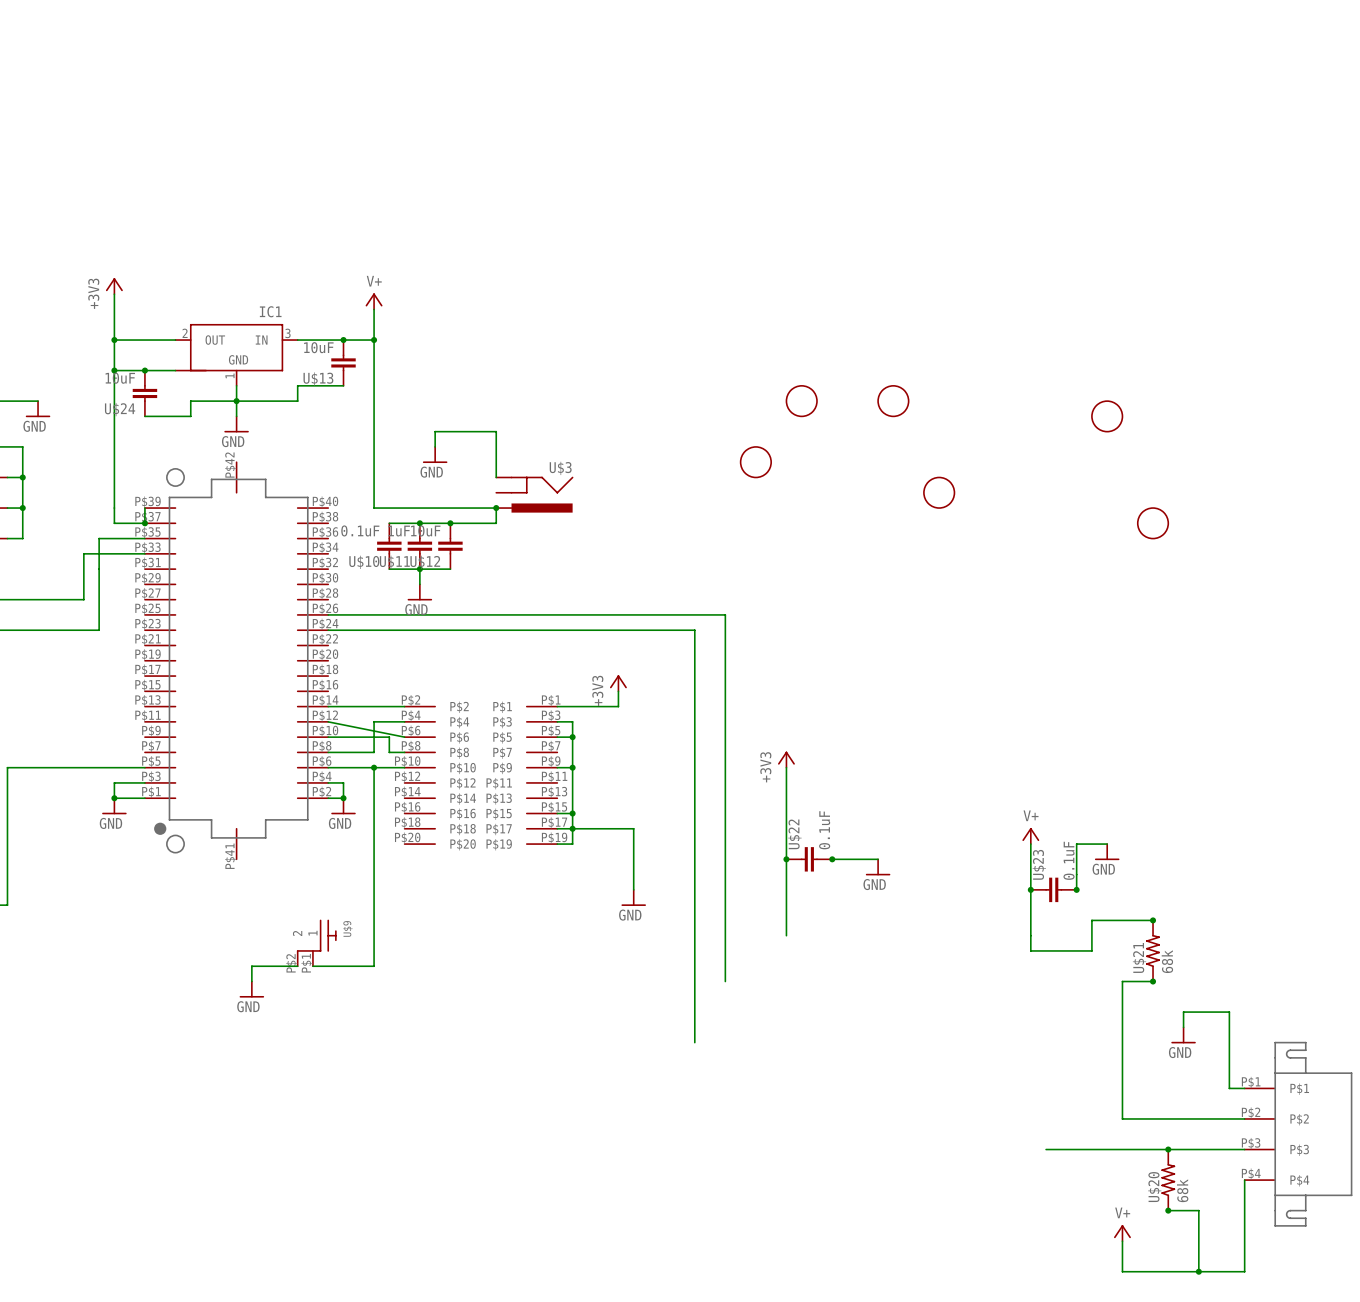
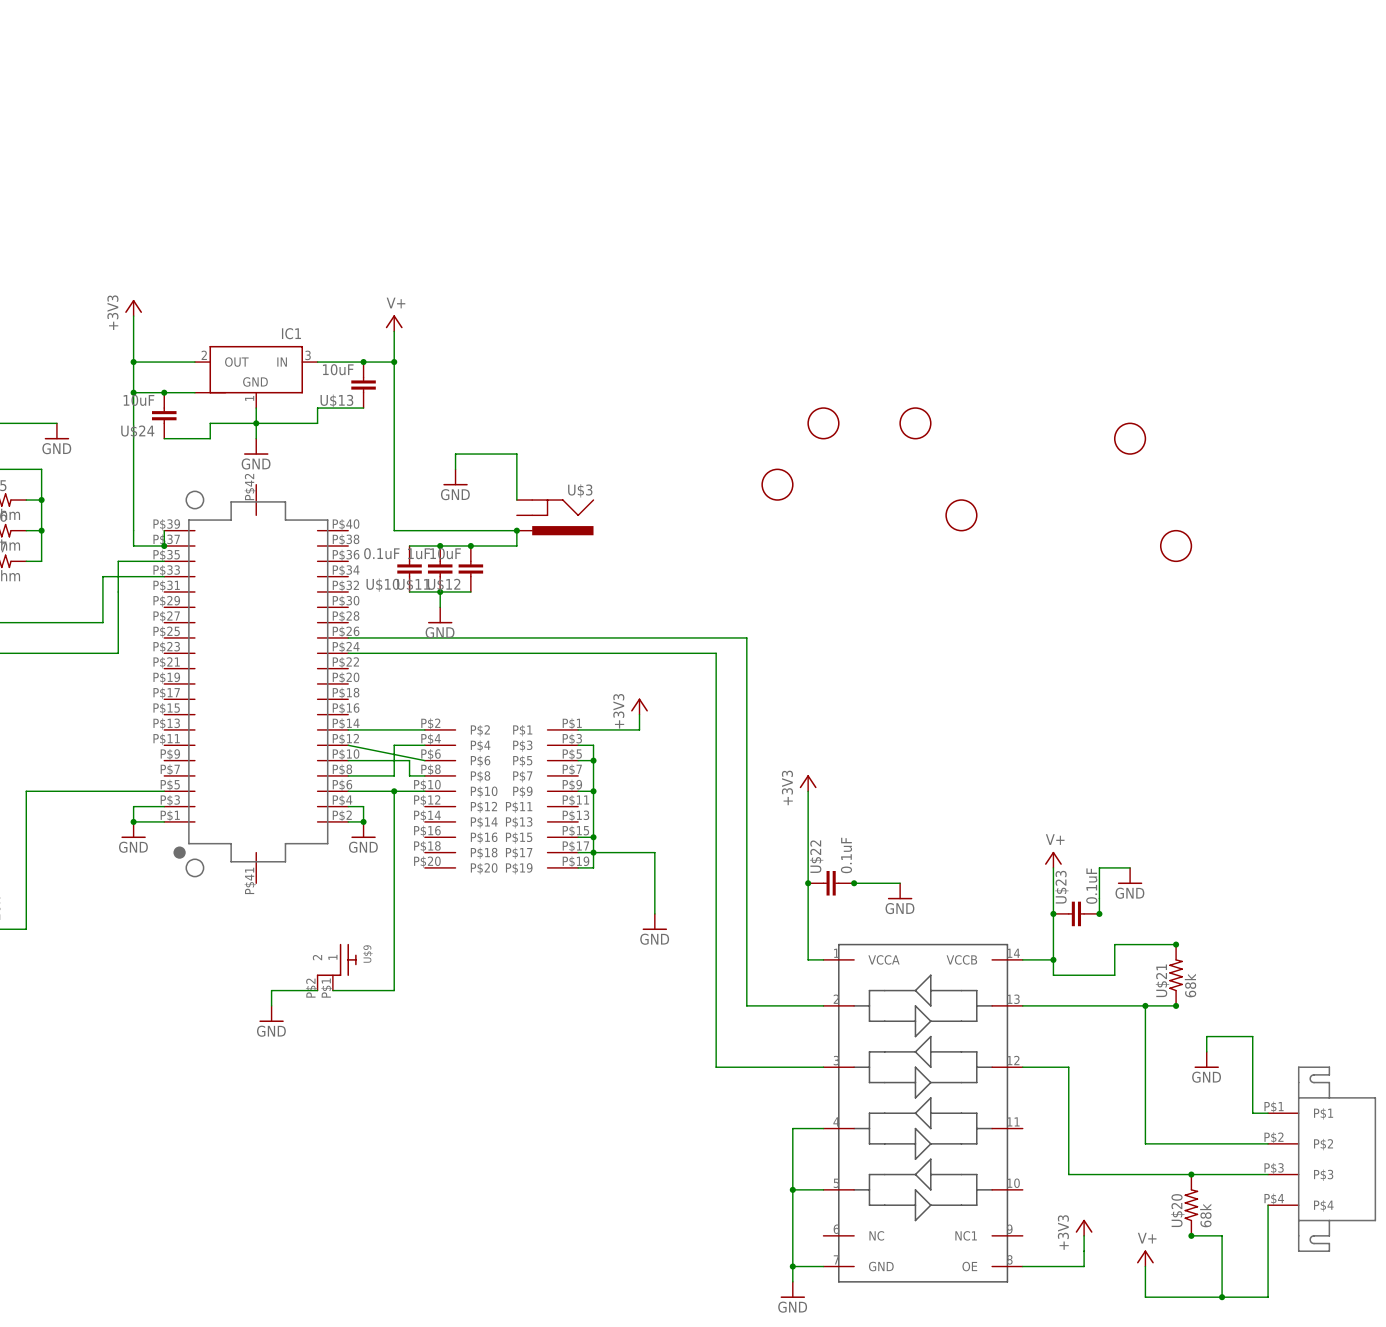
wire: none -> (808, 959) (823, 959)
wire: none -> (1022, 959) (1053, 959)
junction: none -> (1053, 959)
wire: none -> (746, 1005) (823, 1005)
wire: none -> (1022, 1005) (1145, 1005)
junction: none -> (1145, 1005)
wire: none -> (716, 1067) (823, 1067)
wire: none -> (1022, 1067) (1068, 1067) (1068, 1174)
part: none -> (923, 1113)
wire: none -> (823, 1128) (792, 1128) (792, 1281)
wire: none -> (792, 1189) (823, 1189)
junction: none -> (792, 1189)
power symbol: none -> +3V3 (1084, 1227)
wire: none -> (1084, 1235) (1084, 1266) (1022, 1266)
wire: none -> (792, 1266) (823, 1266)
junction: none -> (792, 1266)
power symbol: none -> GND (792, 1289)

